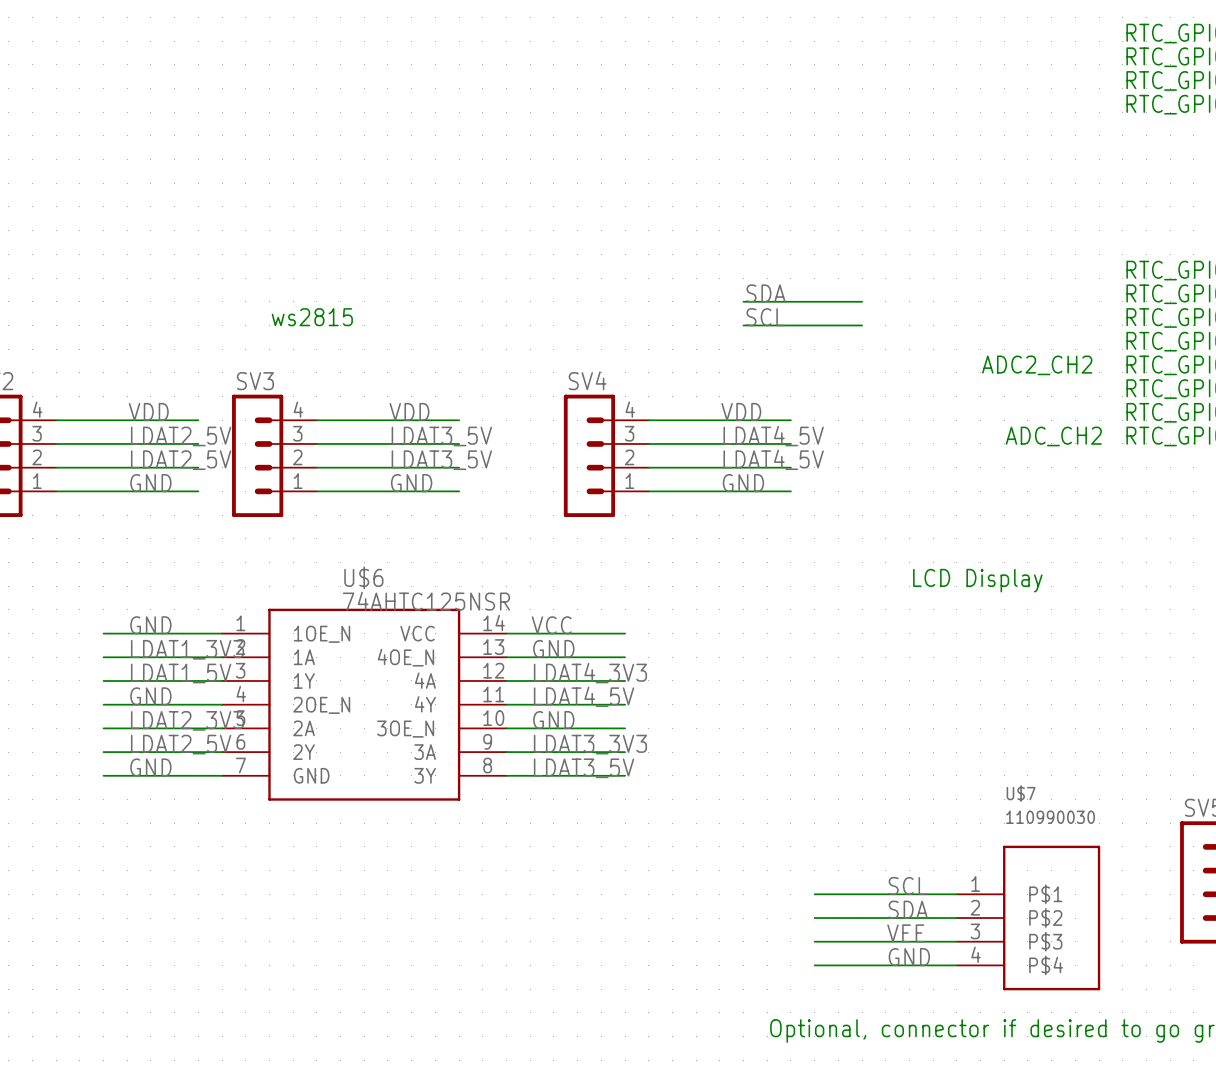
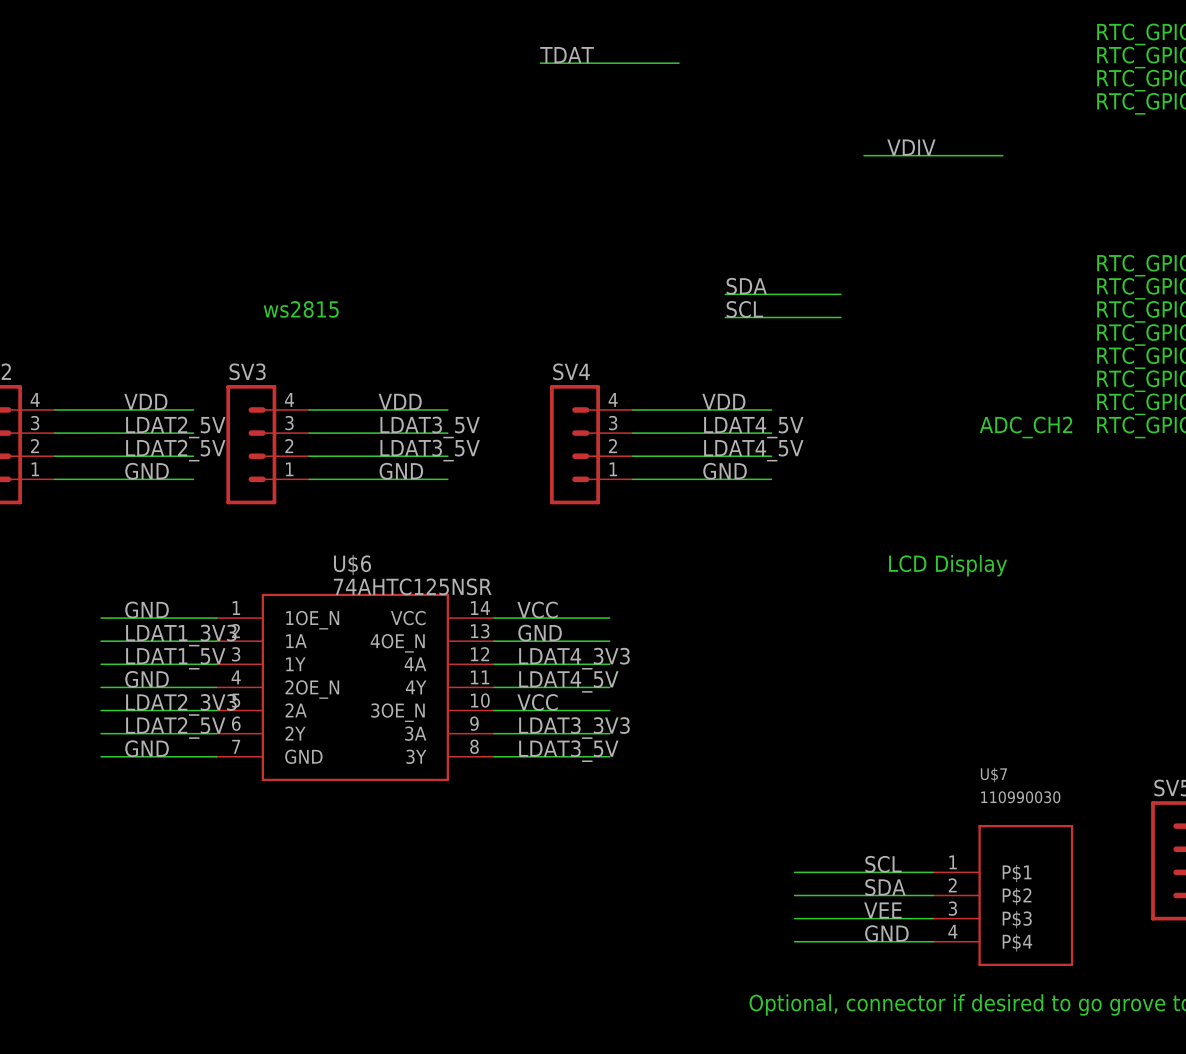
label: none -> TDAT (567, 55)
wire: none -> (540, 63) (679, 63)
label: none -> VDIV (911, 147)
wire: none -> (864, 155) (1002, 155)
text: ADC2_CH2 (1037, 365) -> none
label: GND (553, 720) -> VCC (537, 702)

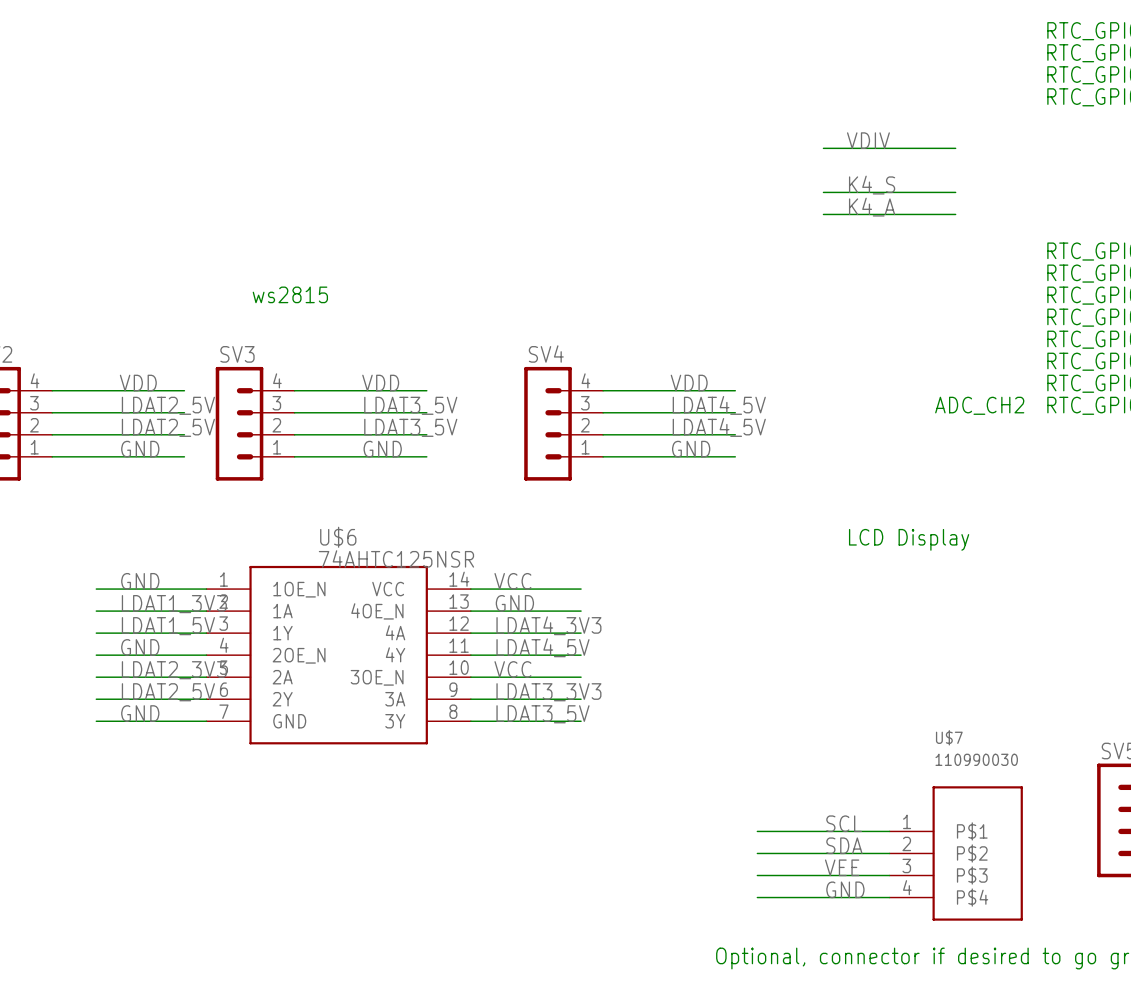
label: TDAT (567, 55) -> none
wire: (540, 63) (679, 63) -> none
label: none -> K4_S (872, 185)
wire: none -> (823, 192) (955, 192)
label: none -> K4_A (872, 207)
wire: none -> (823, 214) (955, 214)
label: SDA (746, 286) -> none
wire: (725, 294) (840, 294) -> none
label: SCL (744, 309) -> none
wire: (725, 317) (840, 317) -> none

